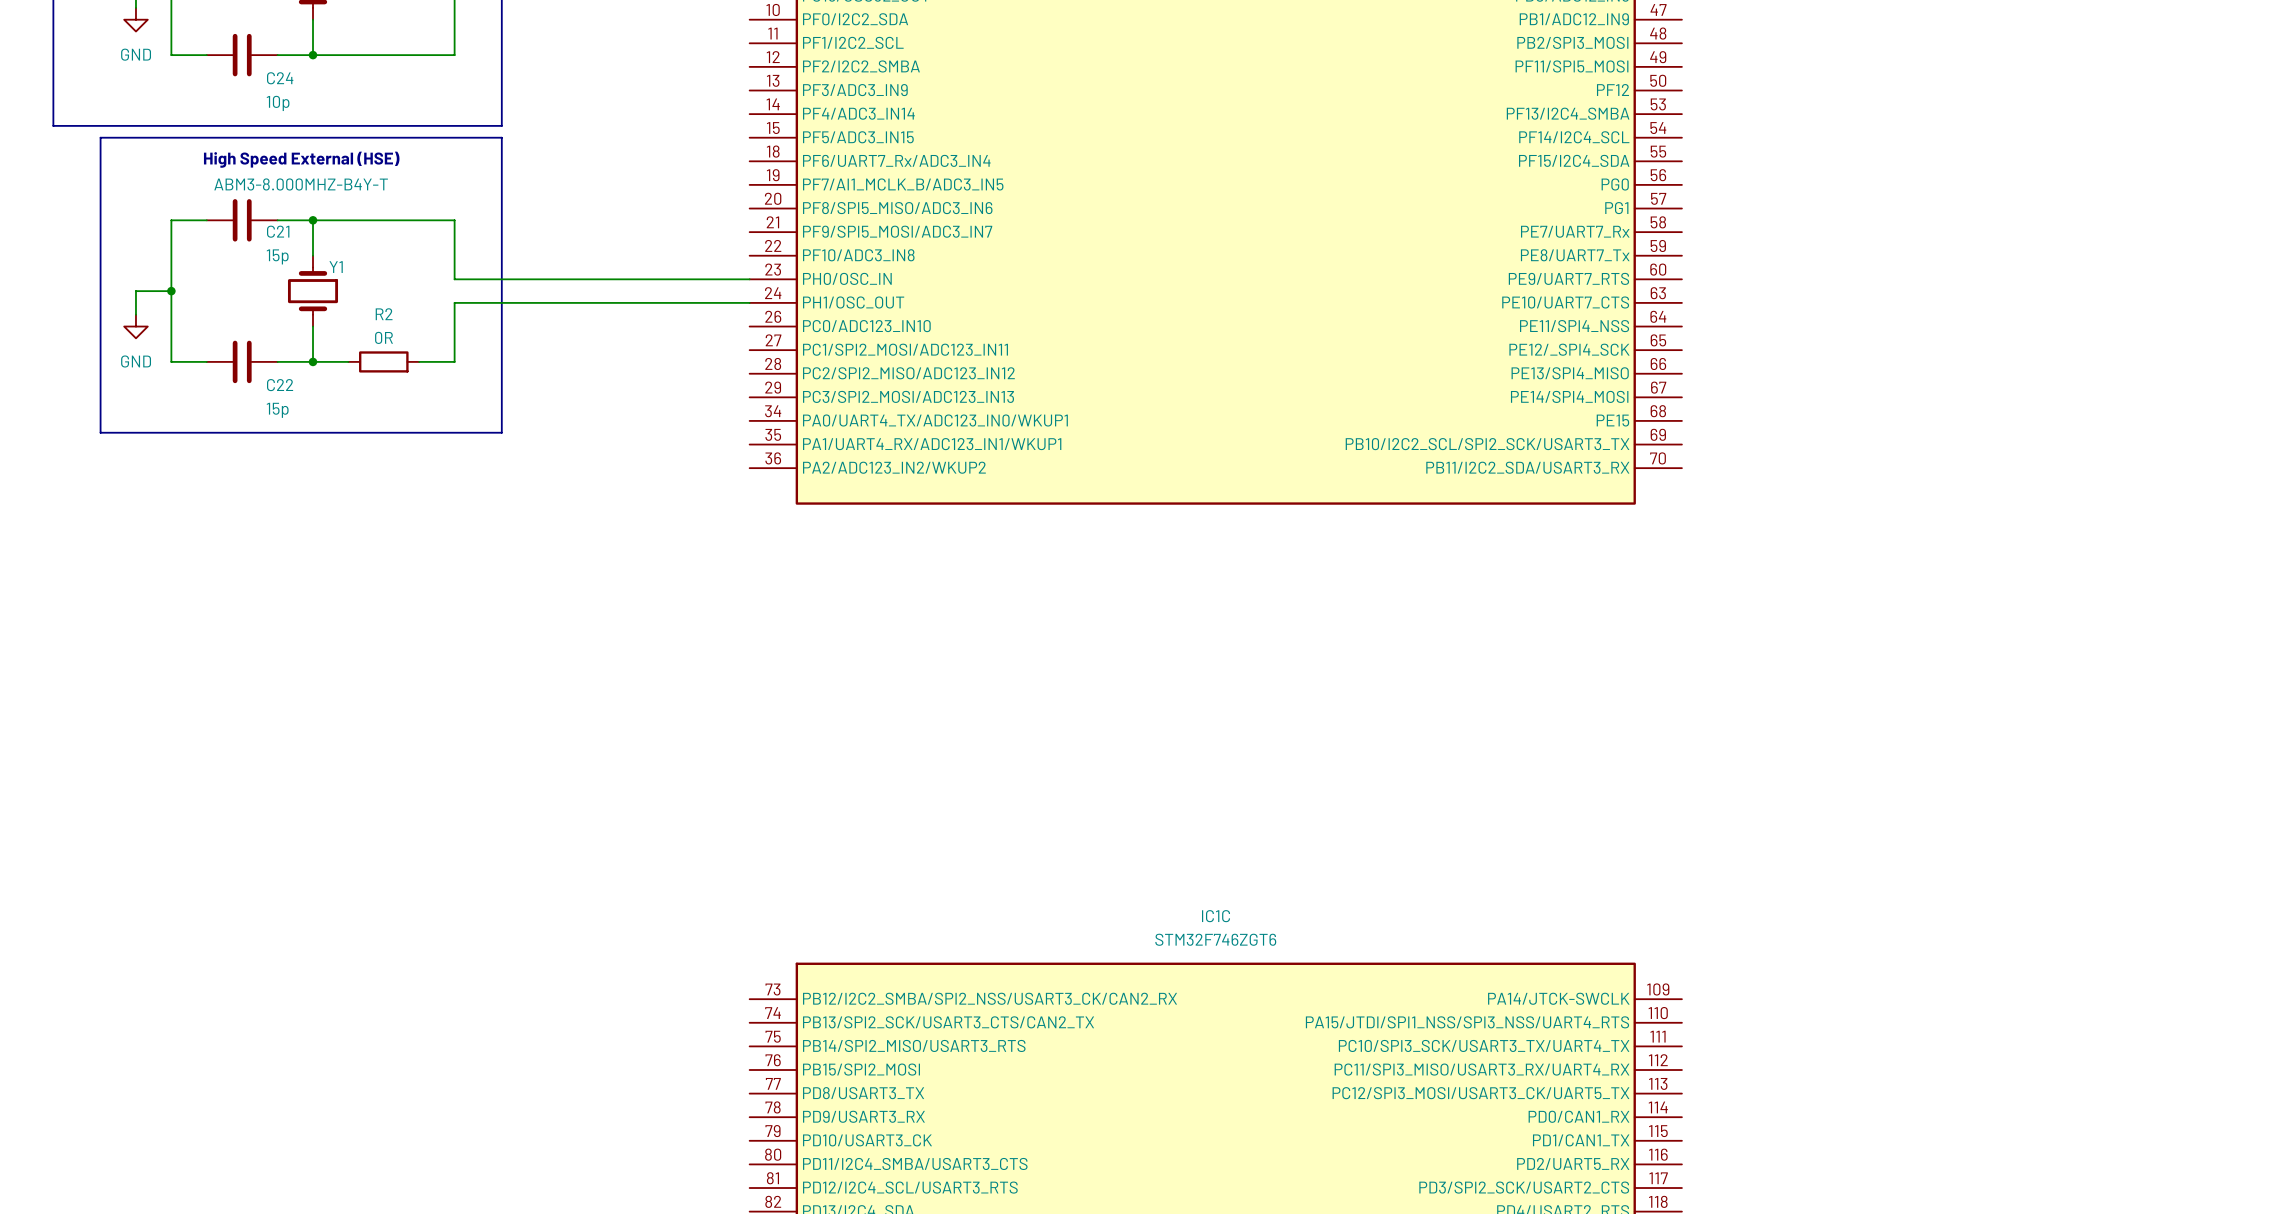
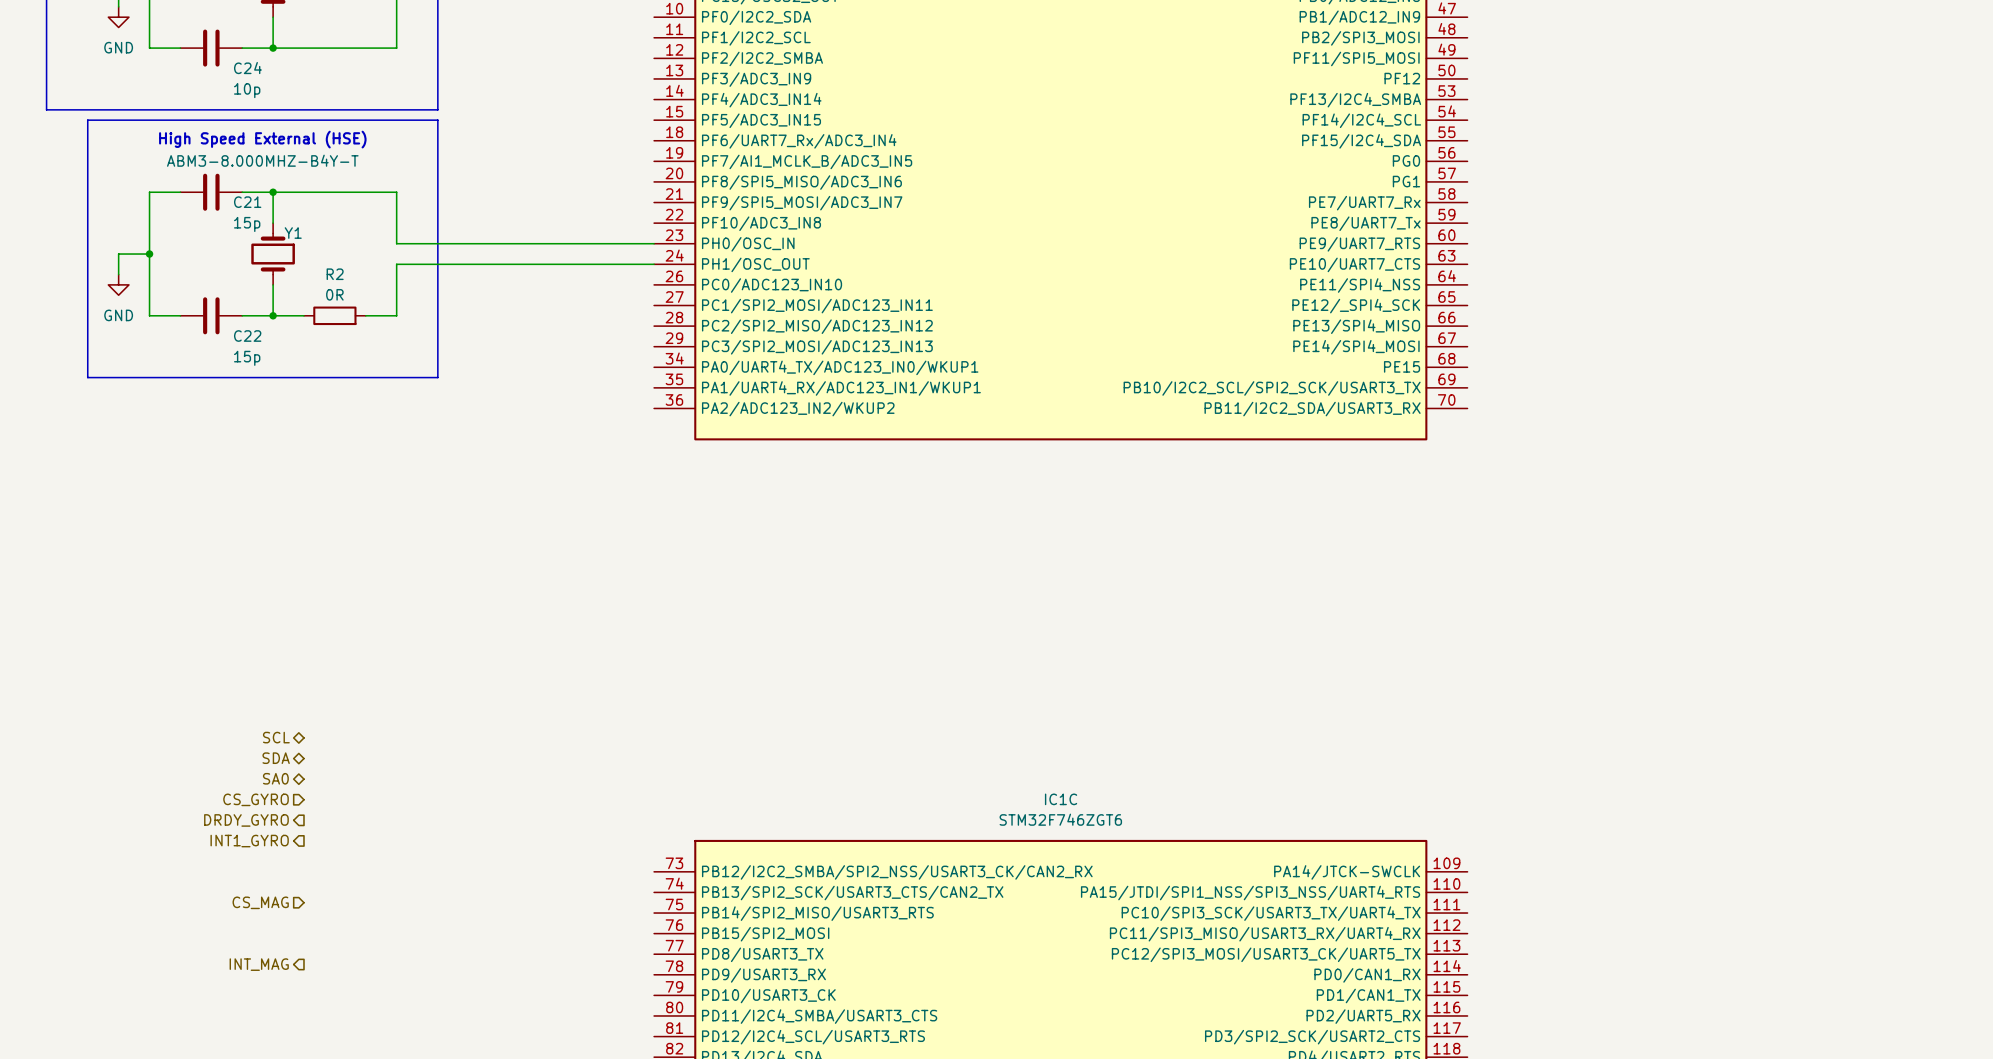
hierarchical label: none -> SCL (276, 737)
hierarchical label: none -> SDA (276, 758)
hierarchical label: none -> SA0 (275, 778)
hierarchical label: none -> CS_GYRO (256, 799)
hierarchical label: none -> DRDY_GYRO (246, 820)
hierarchical label: none -> INT1_GYRO (249, 841)
hierarchical label: none -> CS_MAG (260, 902)
hierarchical label: none -> INT_MAG (259, 964)

